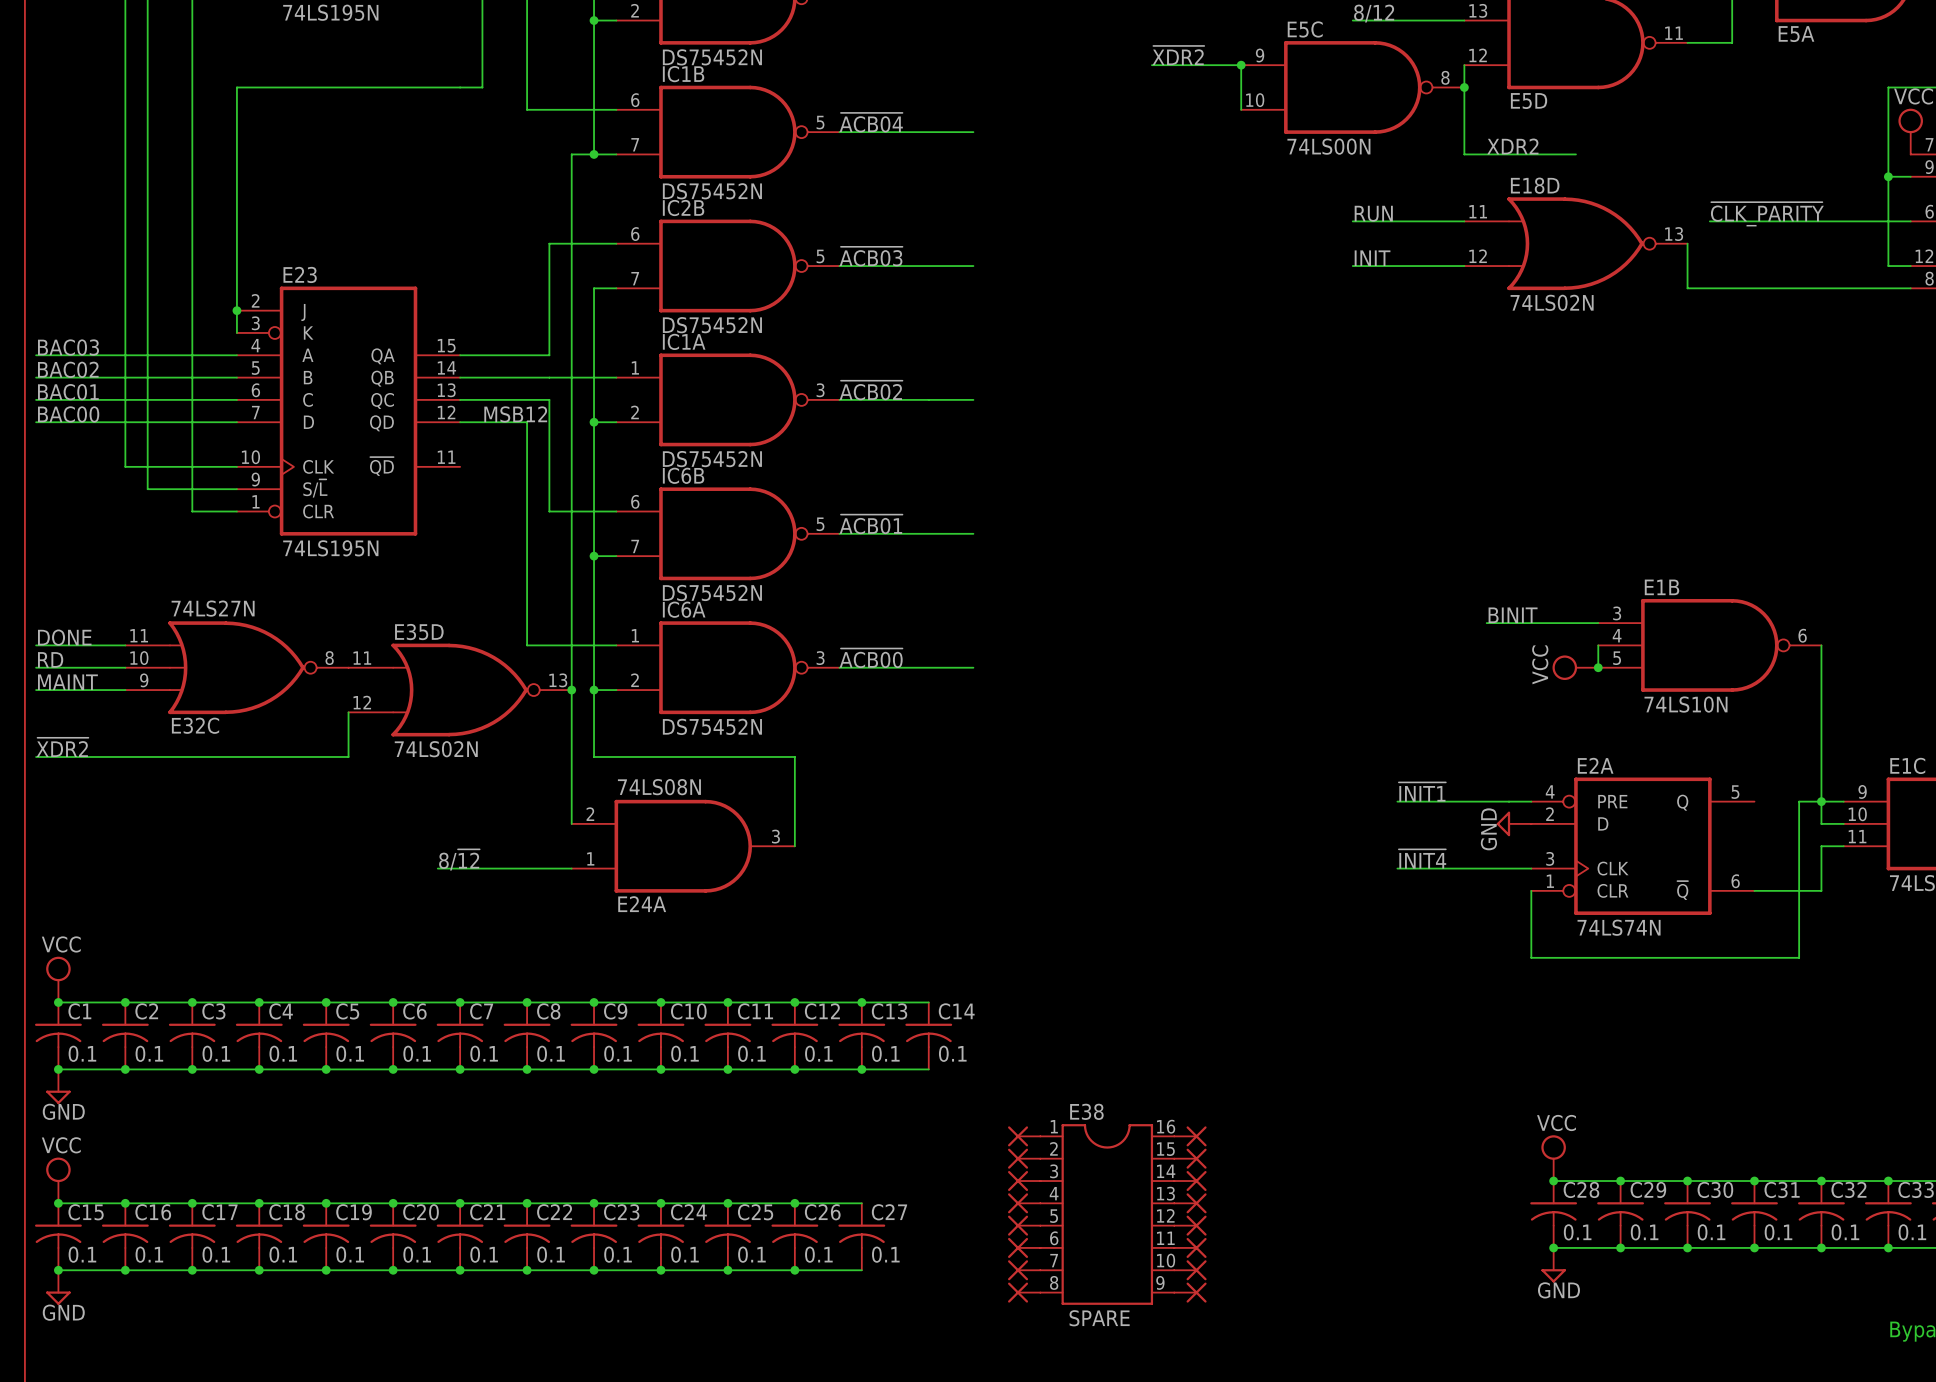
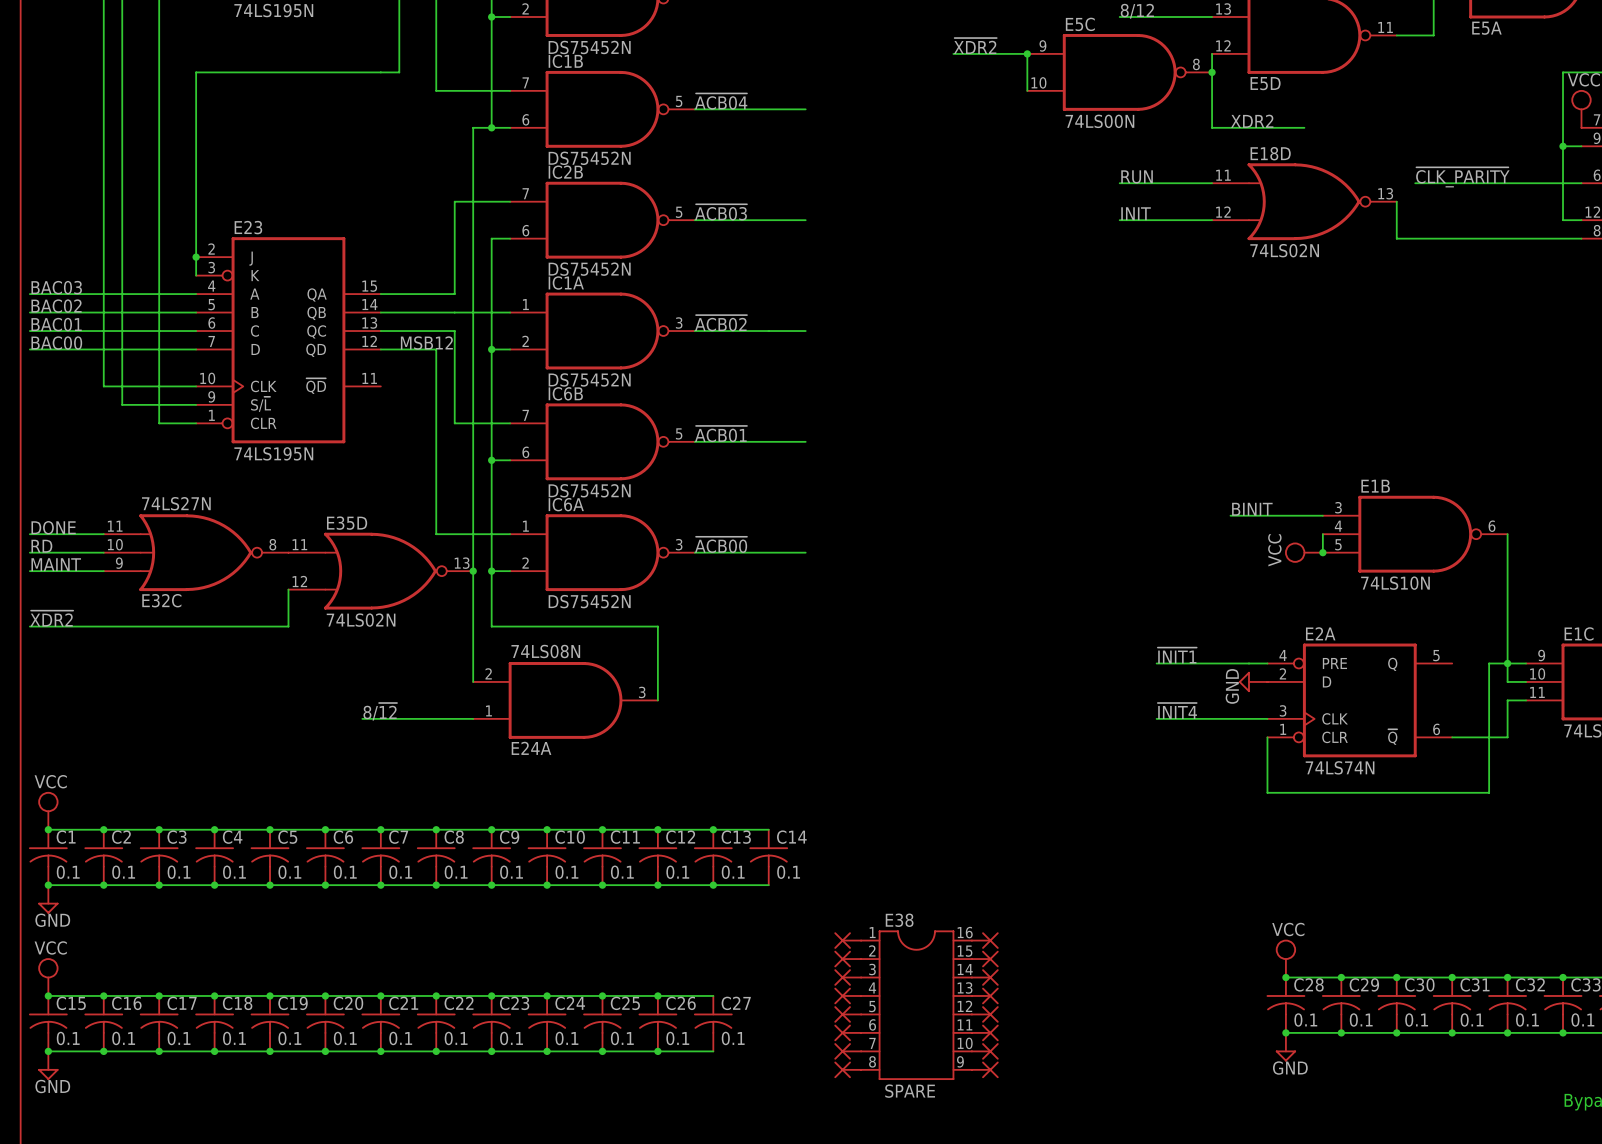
IC1B flip: as is (727, 132) -> up-down (602, 109)
IC2B flip: as is (727, 266) -> up-down (602, 220)
IC6B flip: as is (727, 533) -> up-down (602, 441)

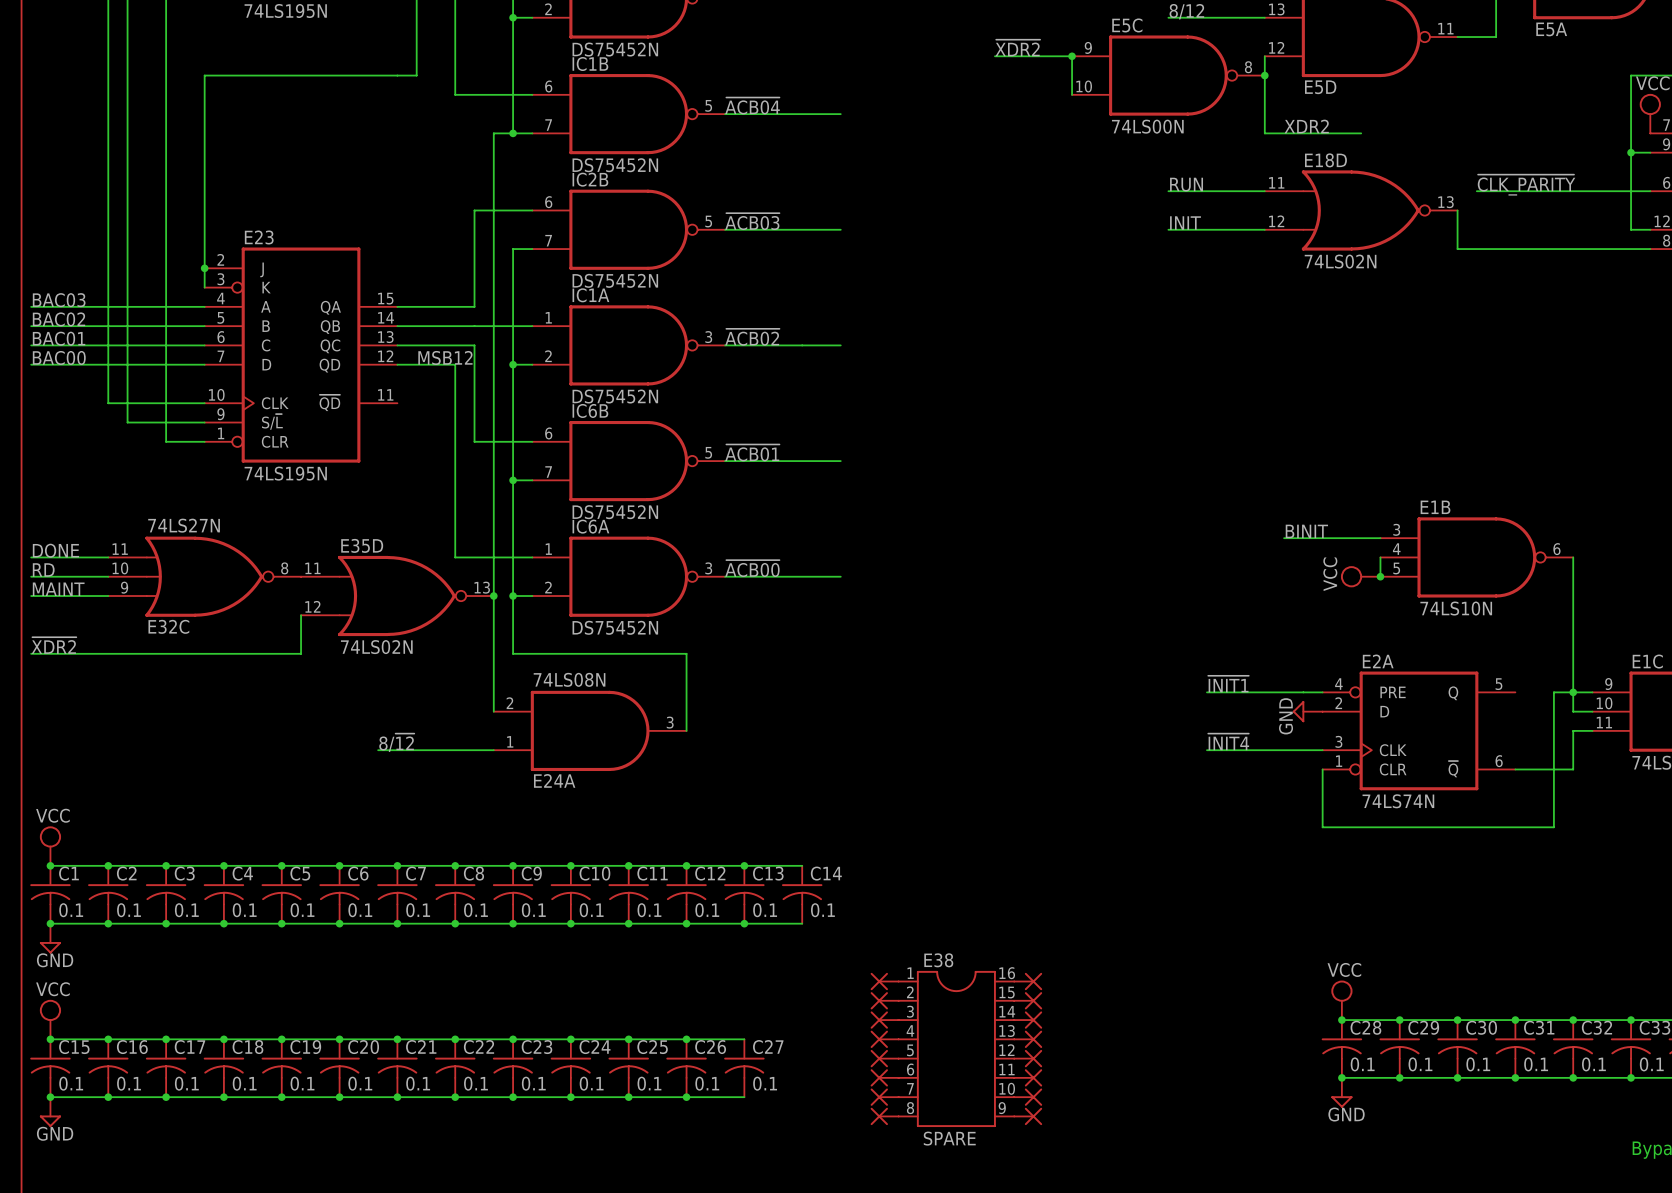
IC1B flip: as is (602, 109) -> up-down (628, 114)
IC2B flip: as is (602, 220) -> up-down (628, 229)
IC6B flip: as is (602, 441) -> up-down (628, 461)

